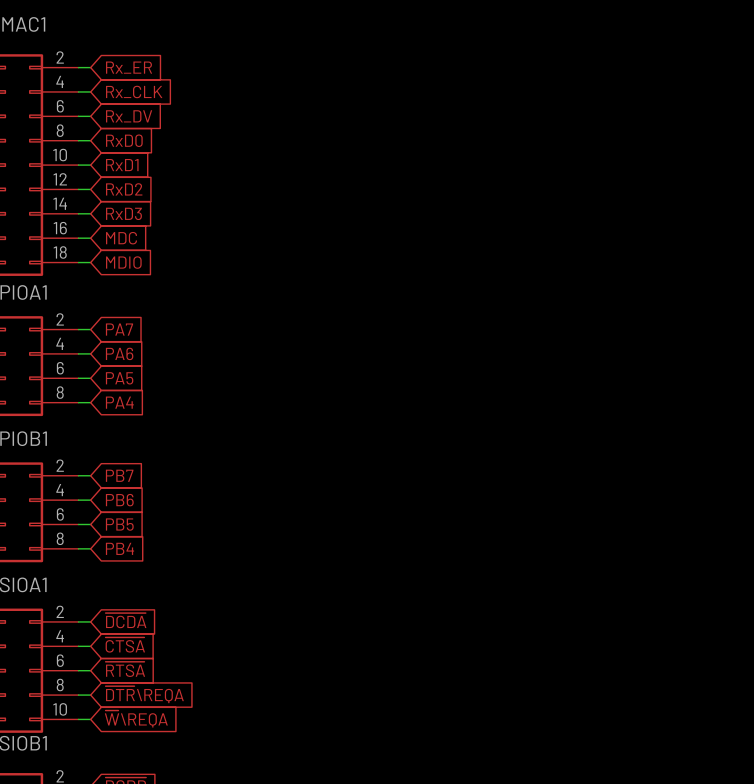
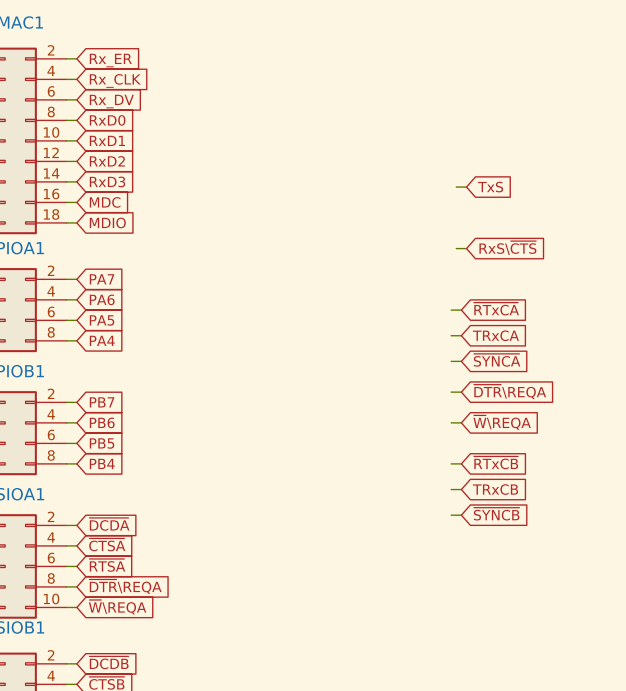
wire: none -> (456, 187) (466, 187)
global label: none -> TxS (490, 187)
global label: none -> RxS\~{CTS} (507, 248)
wire: none -> (456, 248) (466, 248)
global label: none -> ~{RTxCA} (496, 309)
wire: none -> (451, 310) (461, 310)
wire: none -> (451, 335) (461, 335)
global label: none -> TRxCA (495, 335)
global label: none -> ~{SYNCA} (497, 360)
wire: none -> (451, 361) (461, 361)
wire: none -> (451, 392) (461, 392)
global label: none -> ~{DTR}\REQA (510, 391)
global label: none -> ~{W}\REQA (502, 422)
wire: none -> (451, 422) (461, 422)
global label: none -> ~{RTxCB} (496, 462)
wire: none -> (451, 463) (461, 463)
wire: none -> (451, 489) (461, 489)
global label: none -> TRxCB (495, 489)
global label: none -> ~{SYNCB} (496, 514)
wire: none -> (451, 515) (461, 515)

